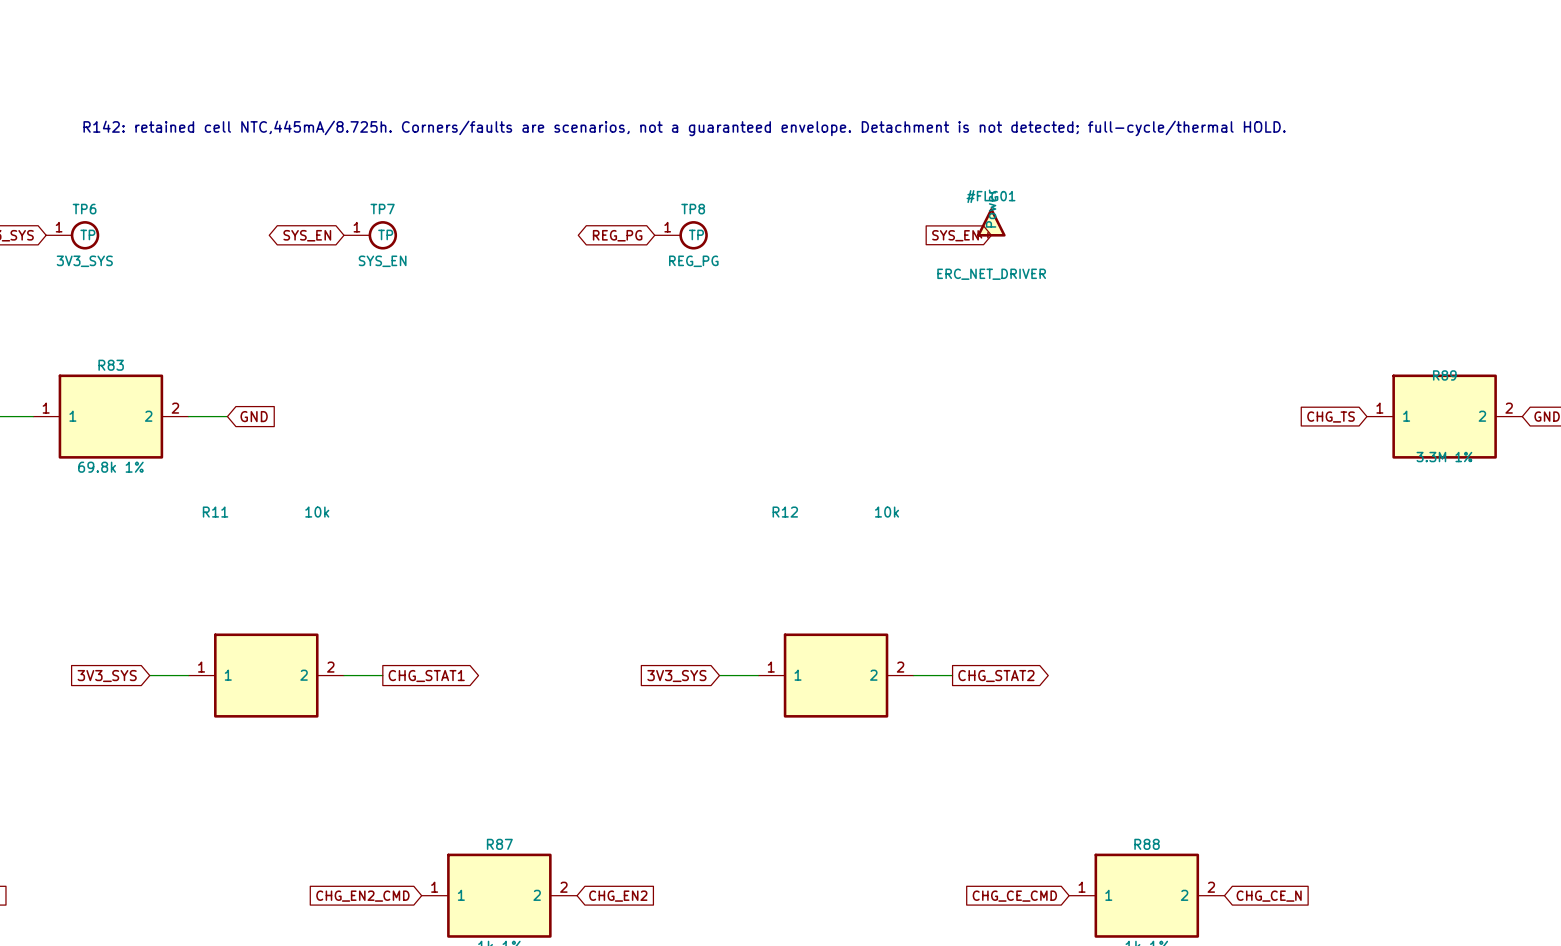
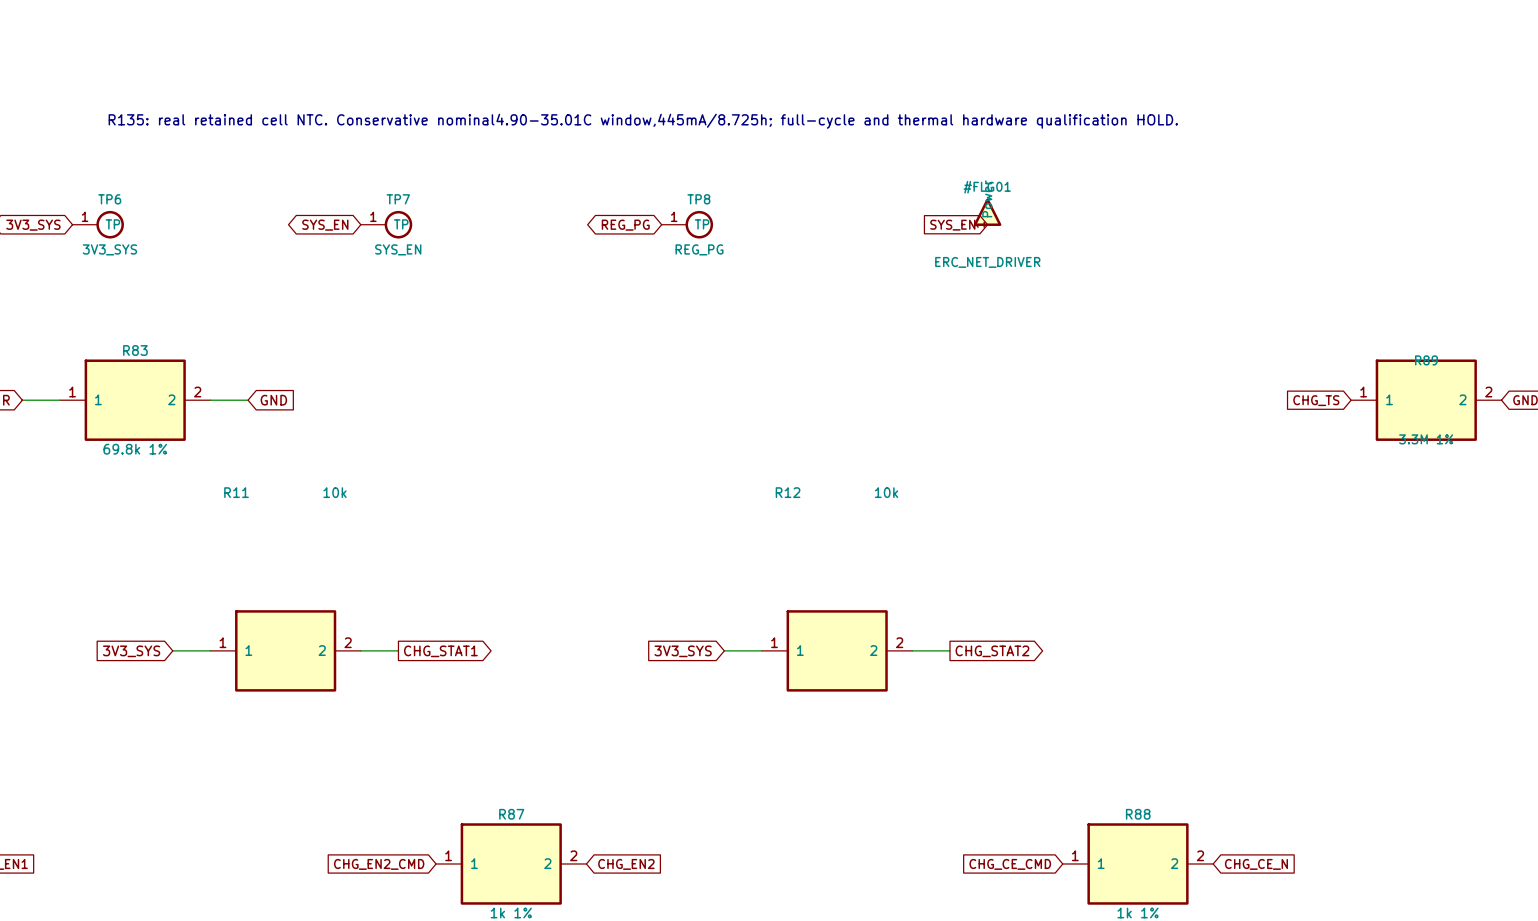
text: R142: retained cell NTC,445mA/8.725h. Corners/faults are scenarios, not a guaranteed envelope. Detachment is not detected; full-cycle/thermal HOLD. (684, 128) -> R135: real retained cell NTC. Conservative nominal4.90-35.01C window,445mA/8.725h; full-cycle and thermal hardware qualification HOLD. (643, 121)

